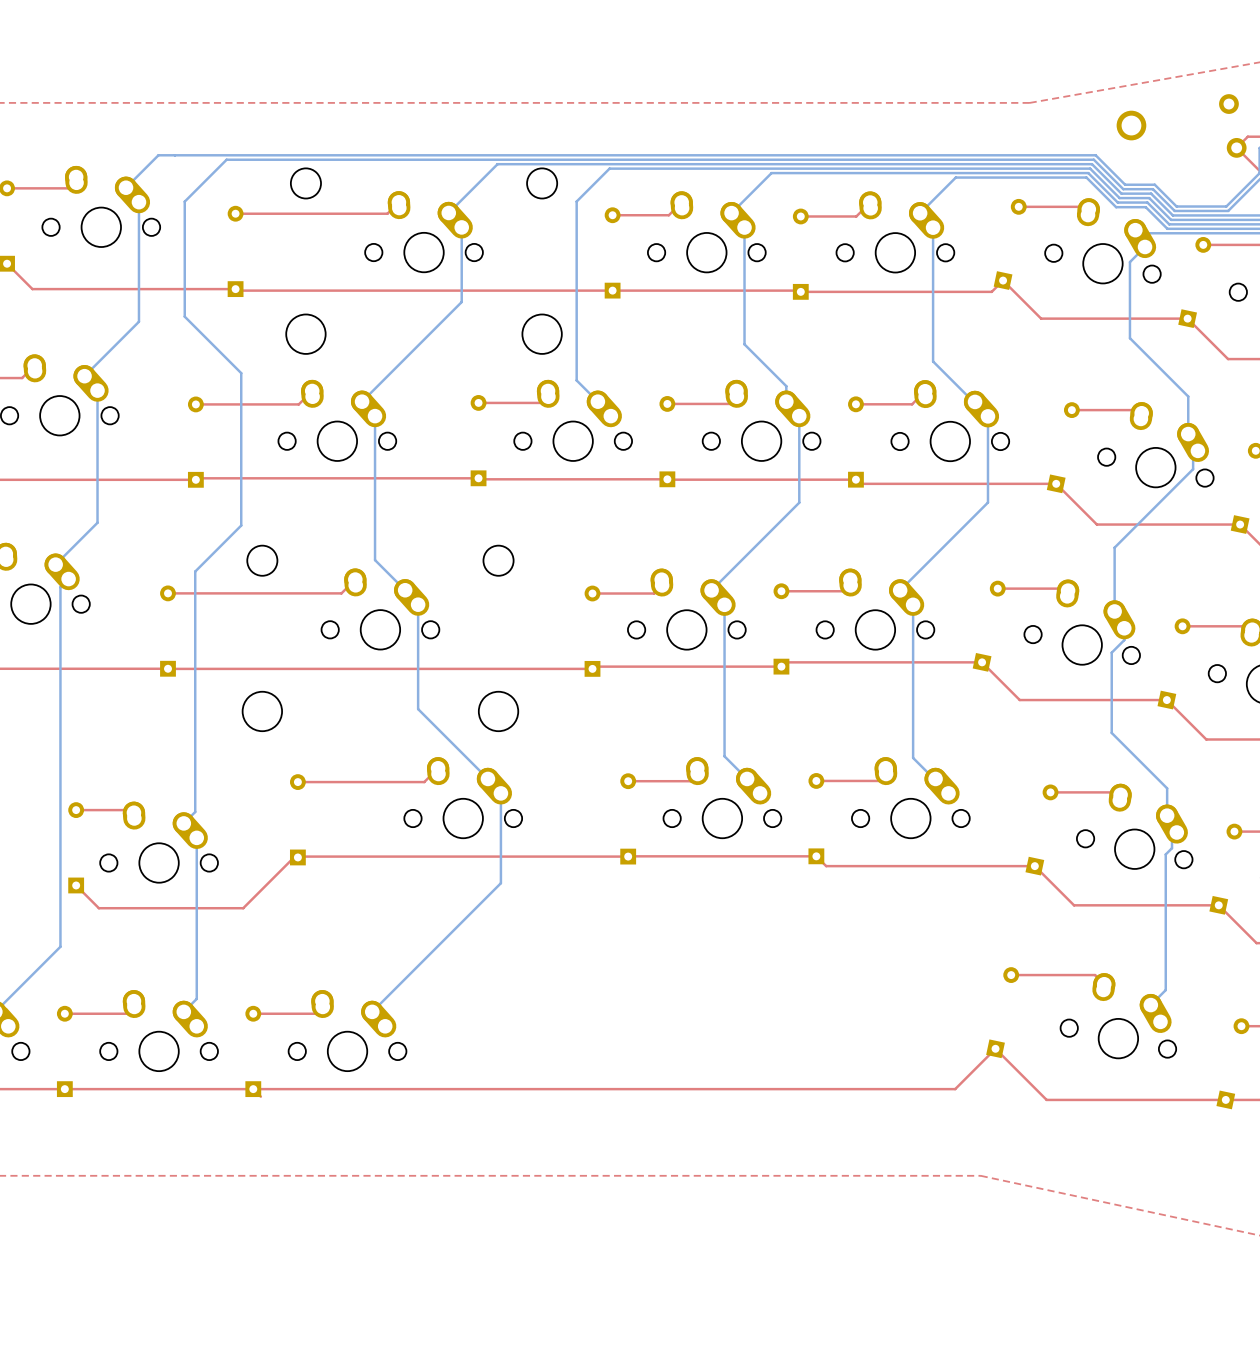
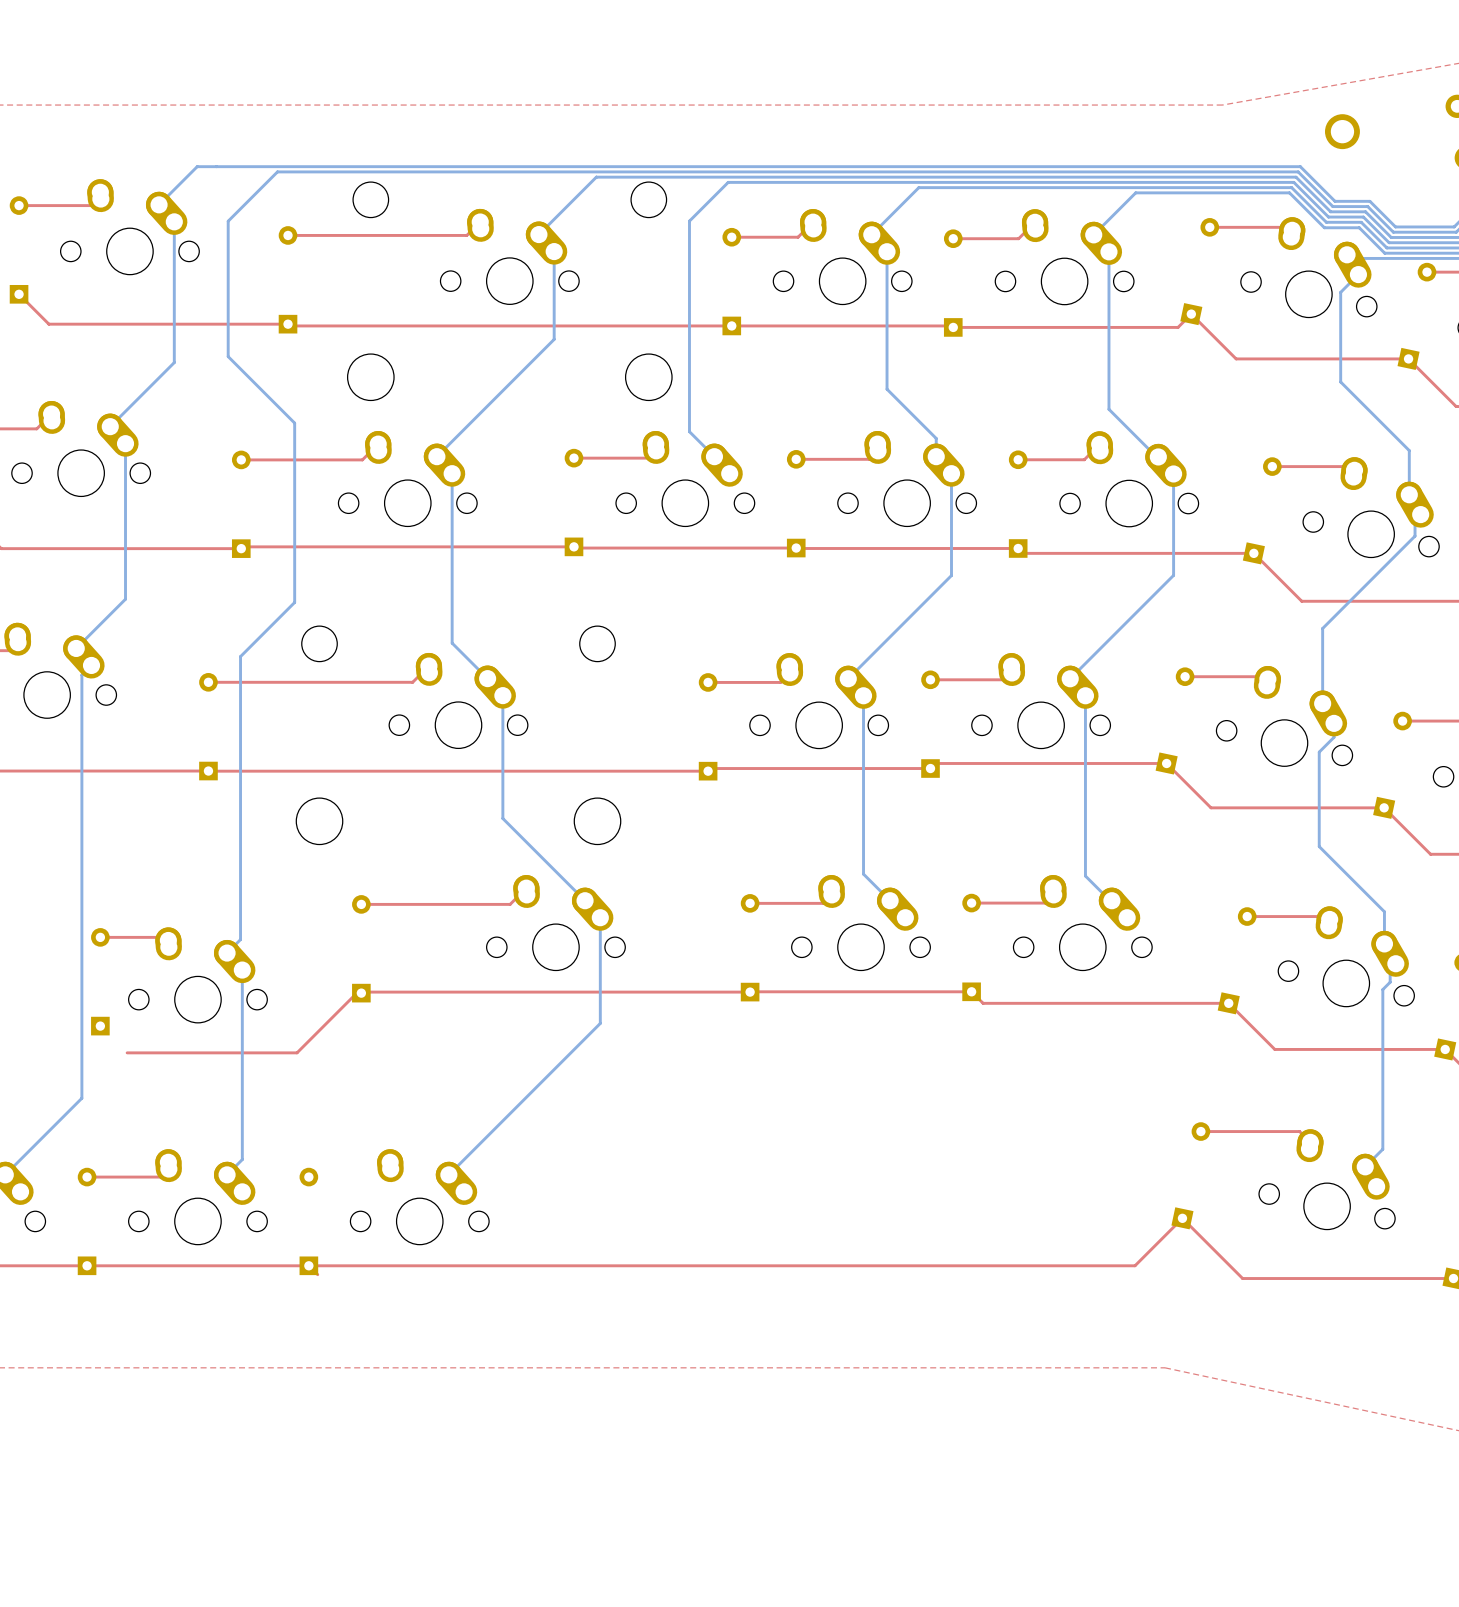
top track: (76, 885) (98, 908) -> none
top track: (322, 1006) (315, 1013) (253, 1013) -> none

